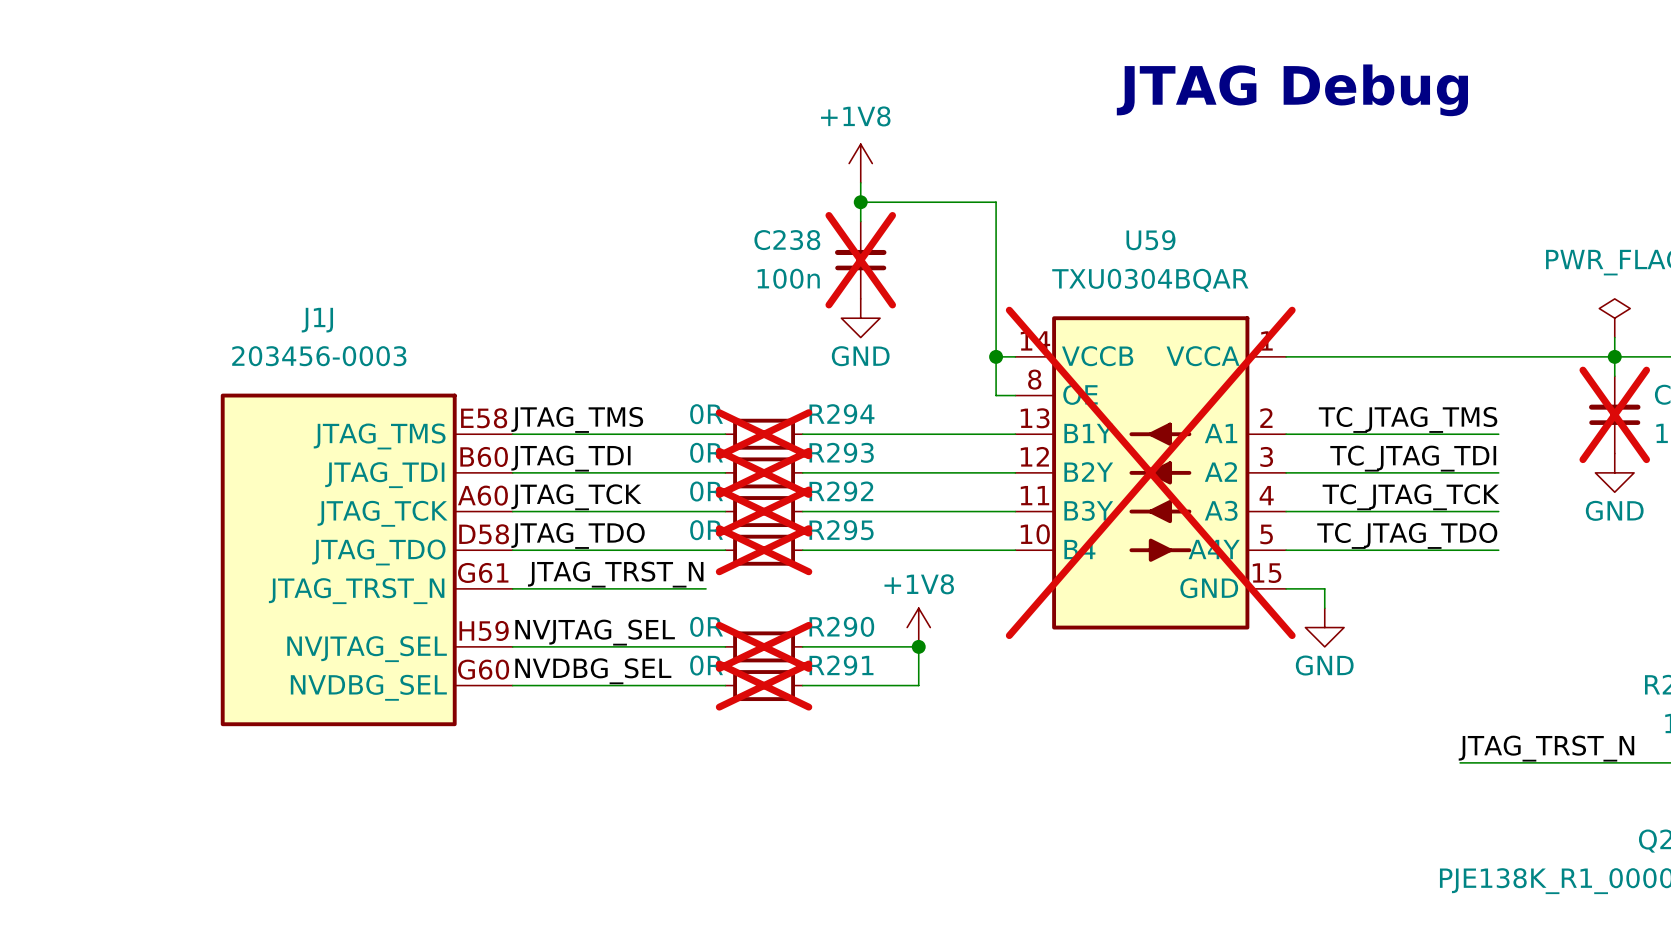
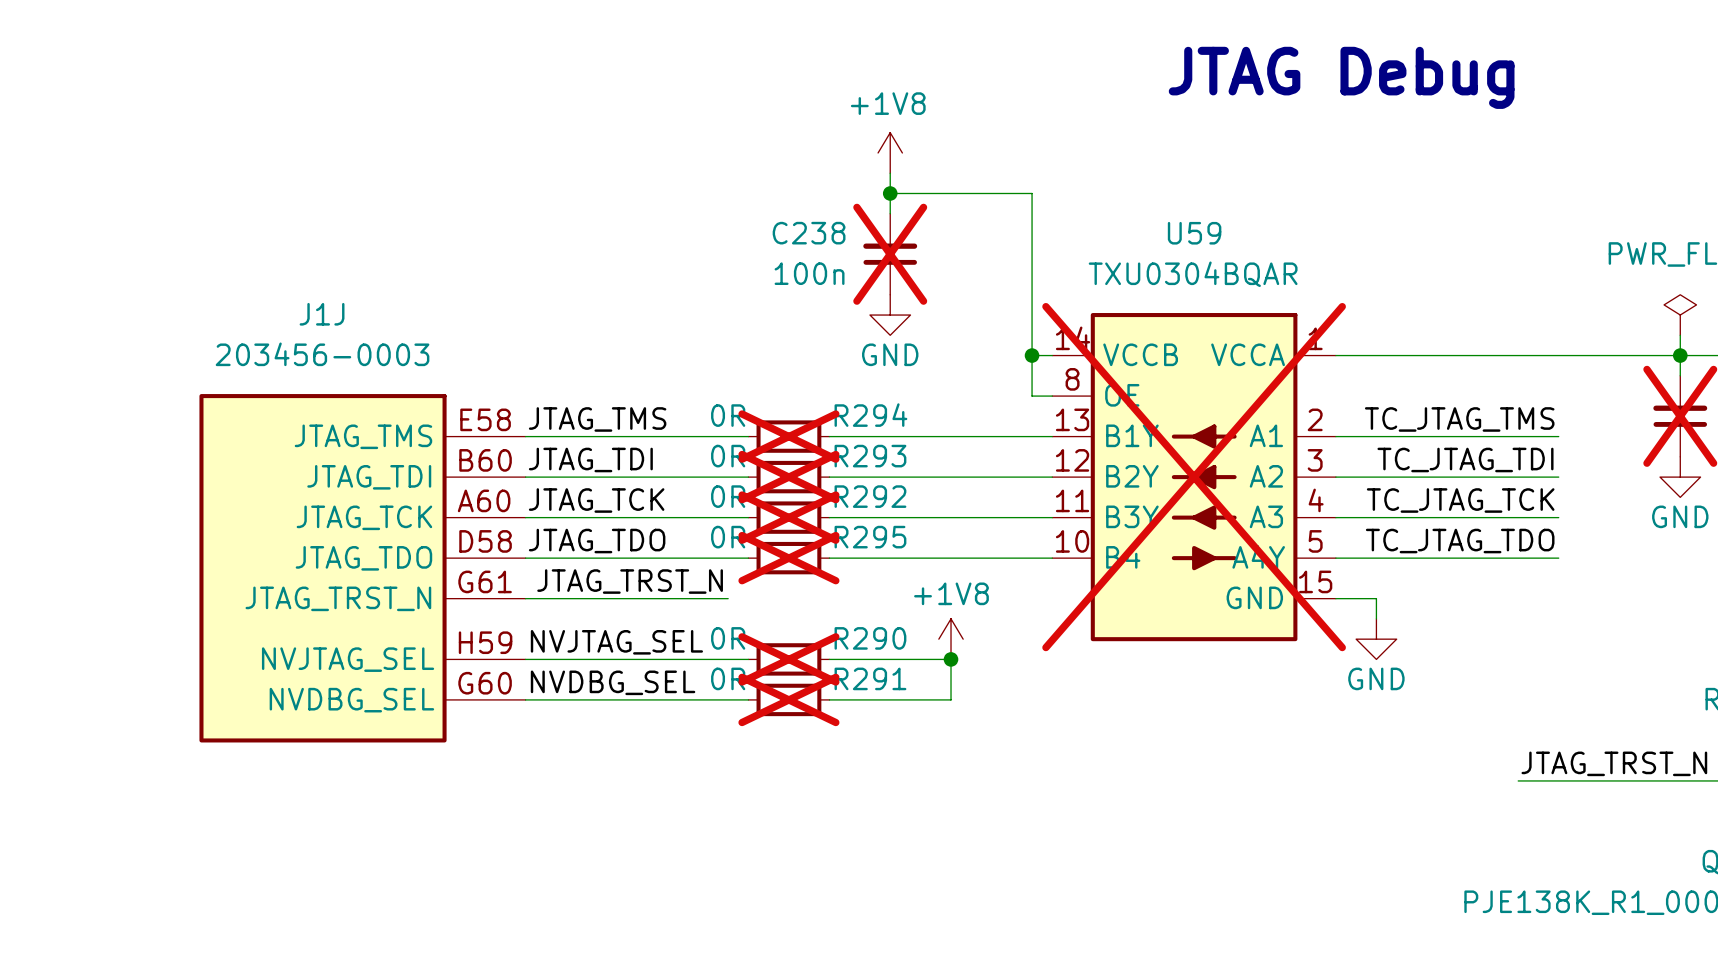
J1J symbol: [220, 393, 513, 727] -> [199, 394, 526, 743]

